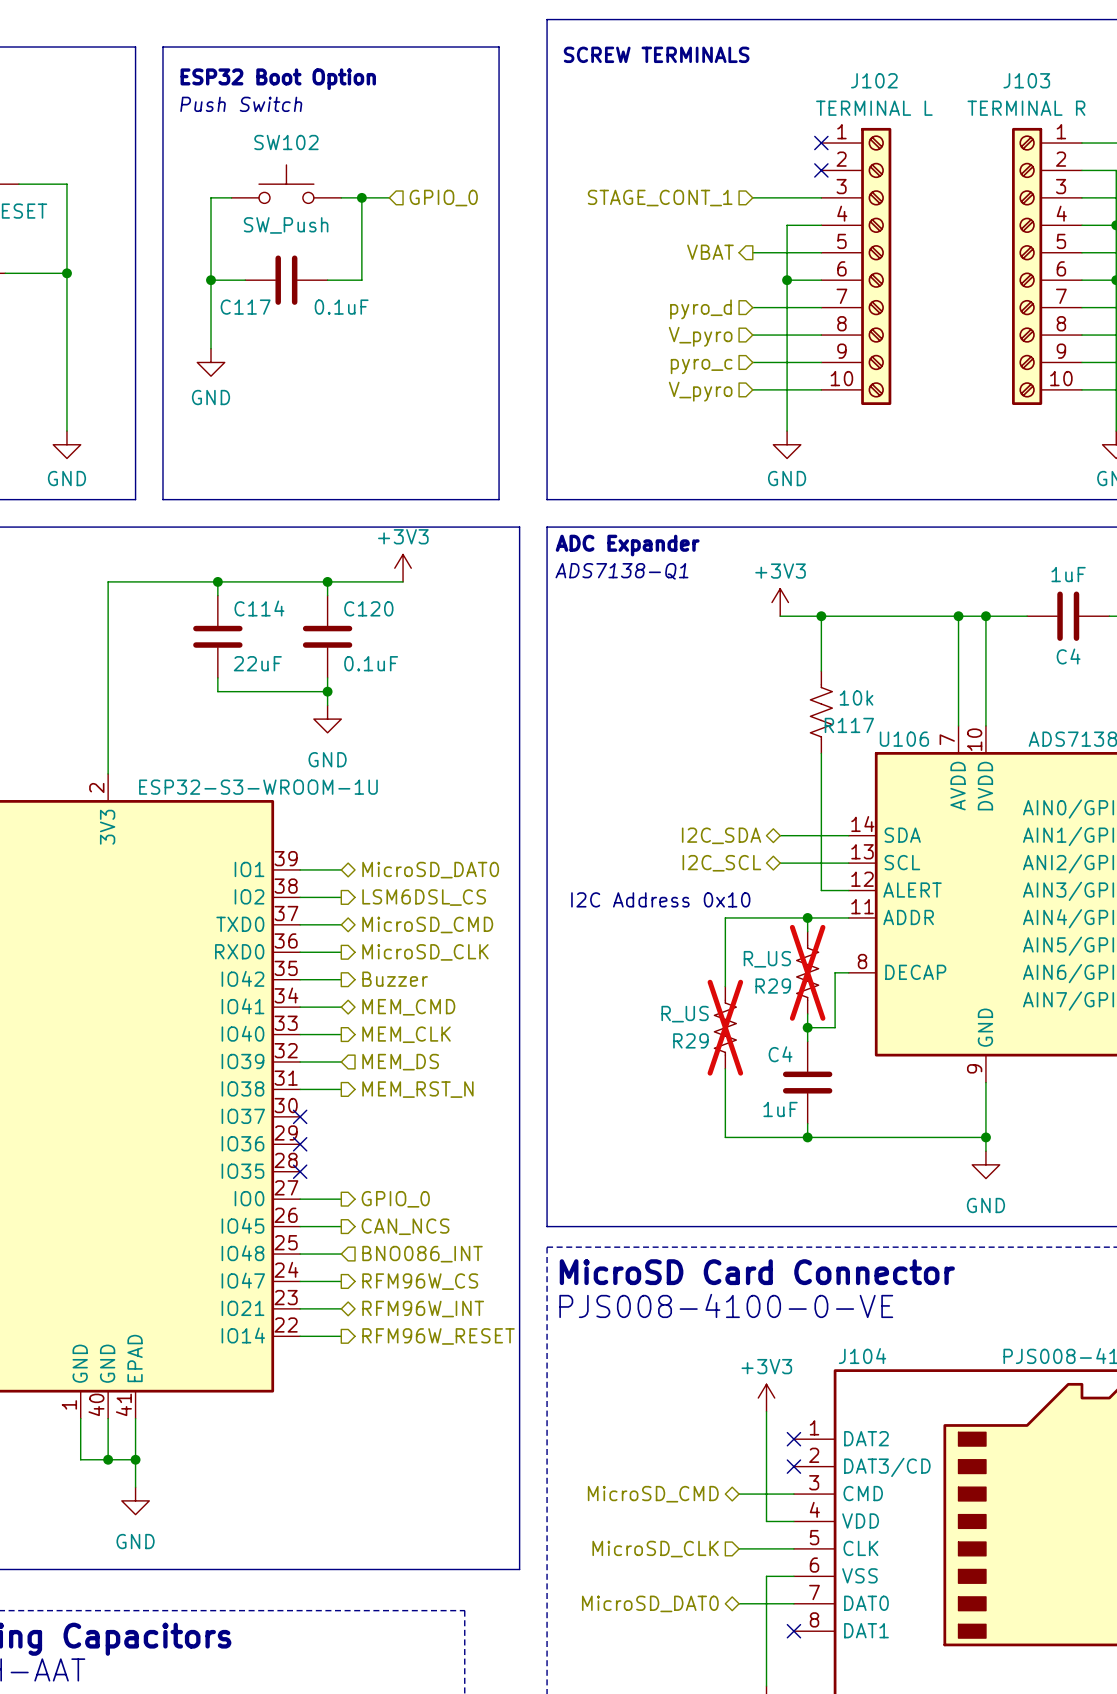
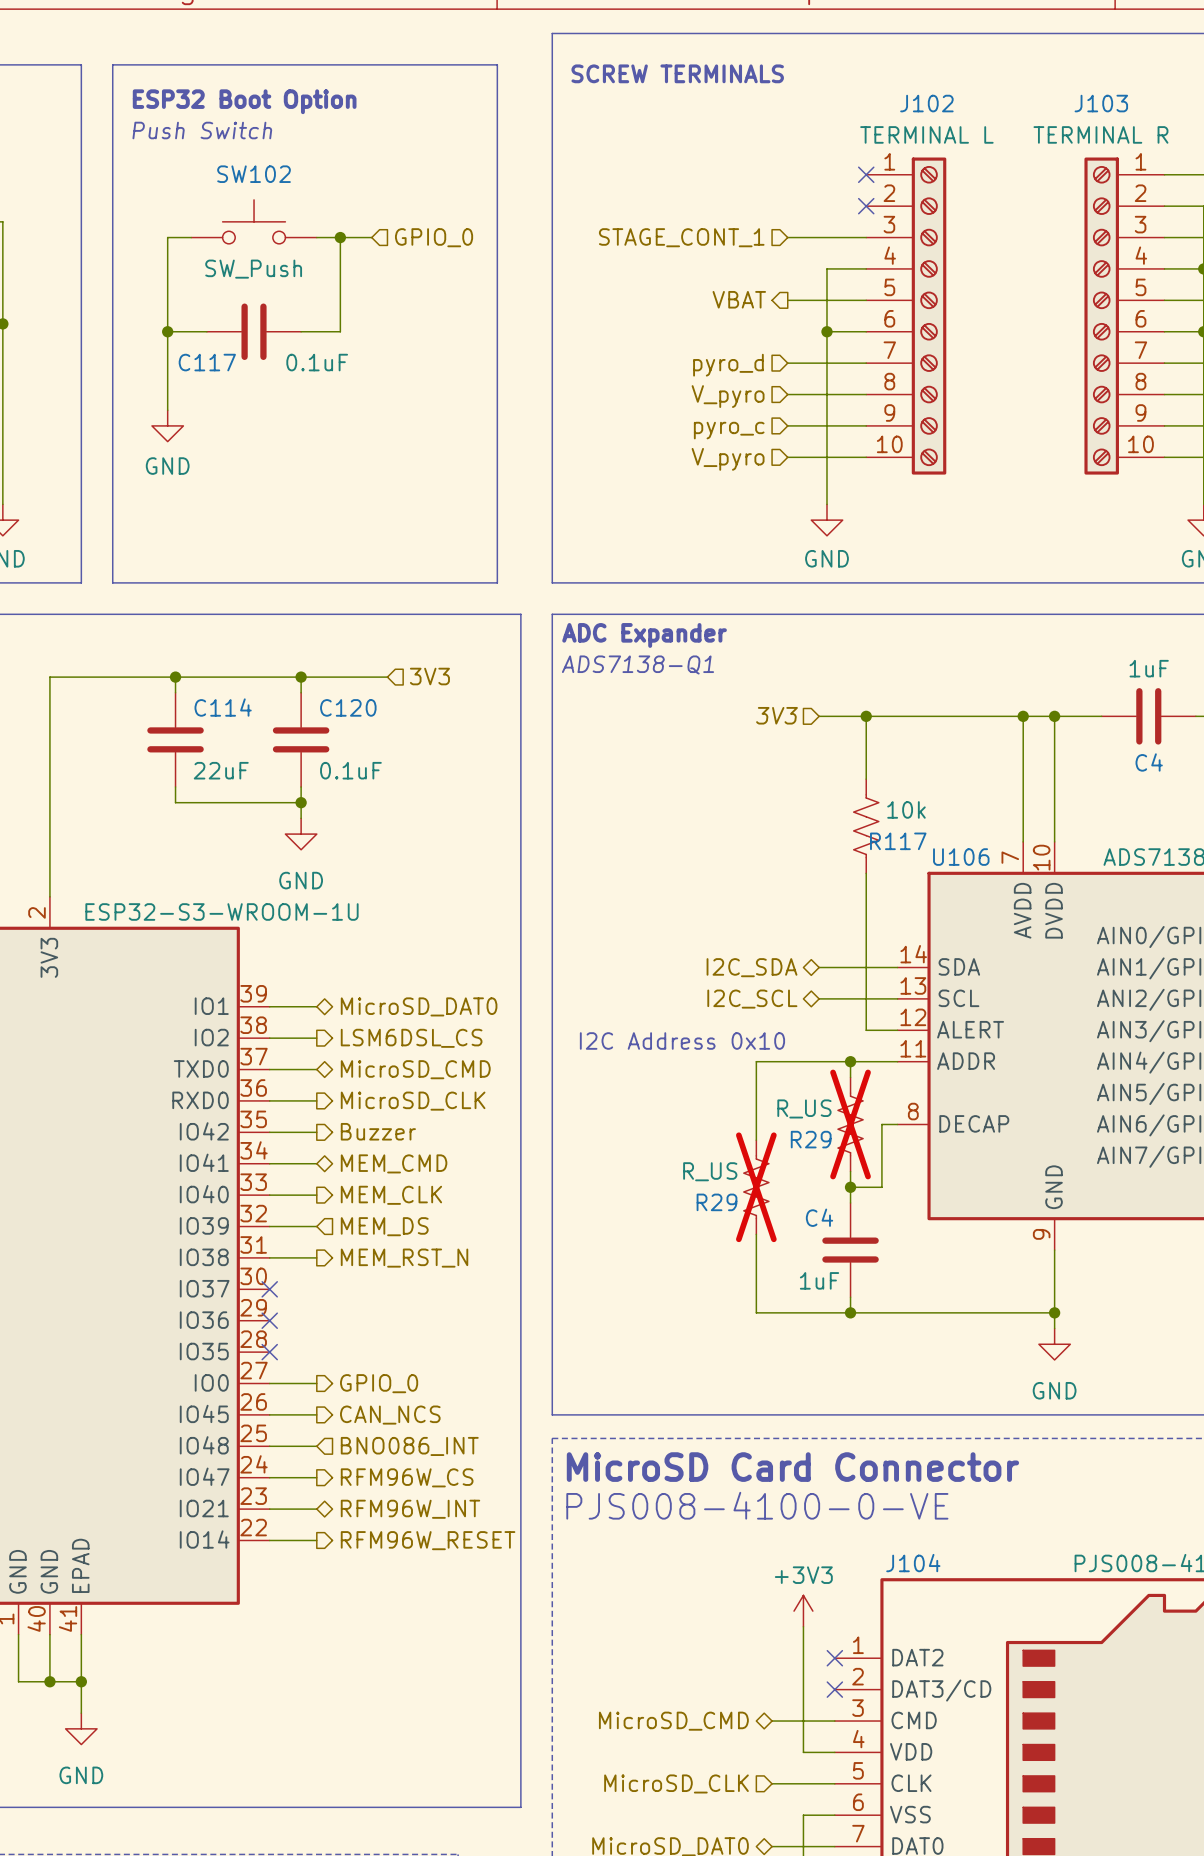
power symbol: +3V3 (403, 568) -> none
hierarchical label: none -> 3V3 (429, 676)
power symbol: +3V3 (780, 602) -> none
hierarchical label: none -> 3V3 (776, 715)

